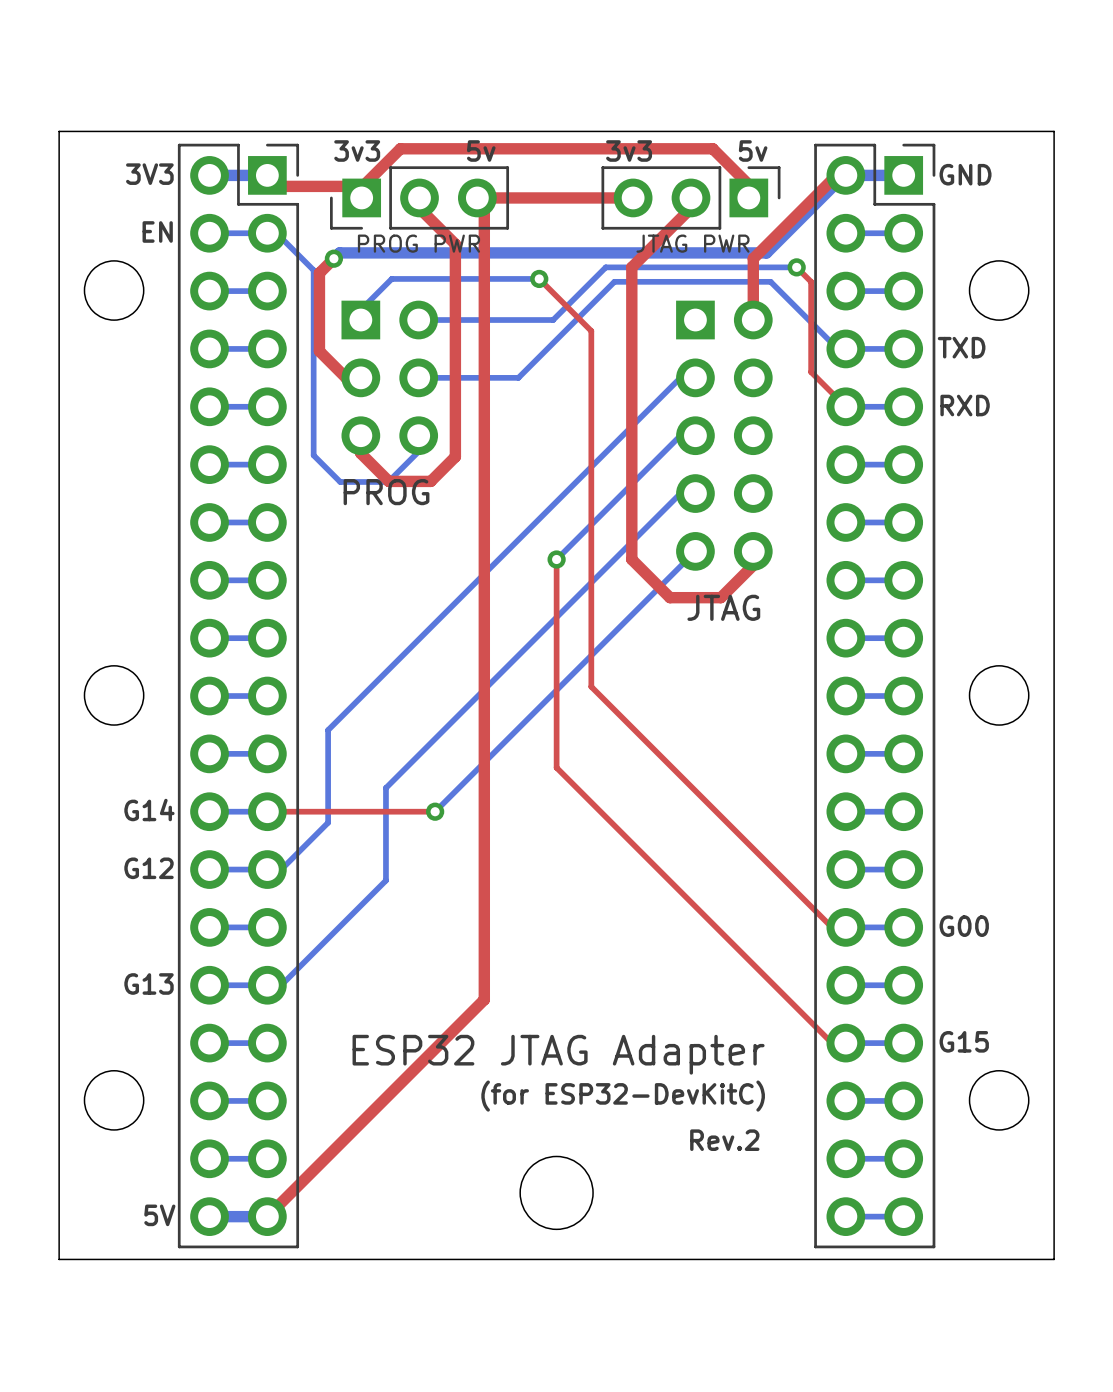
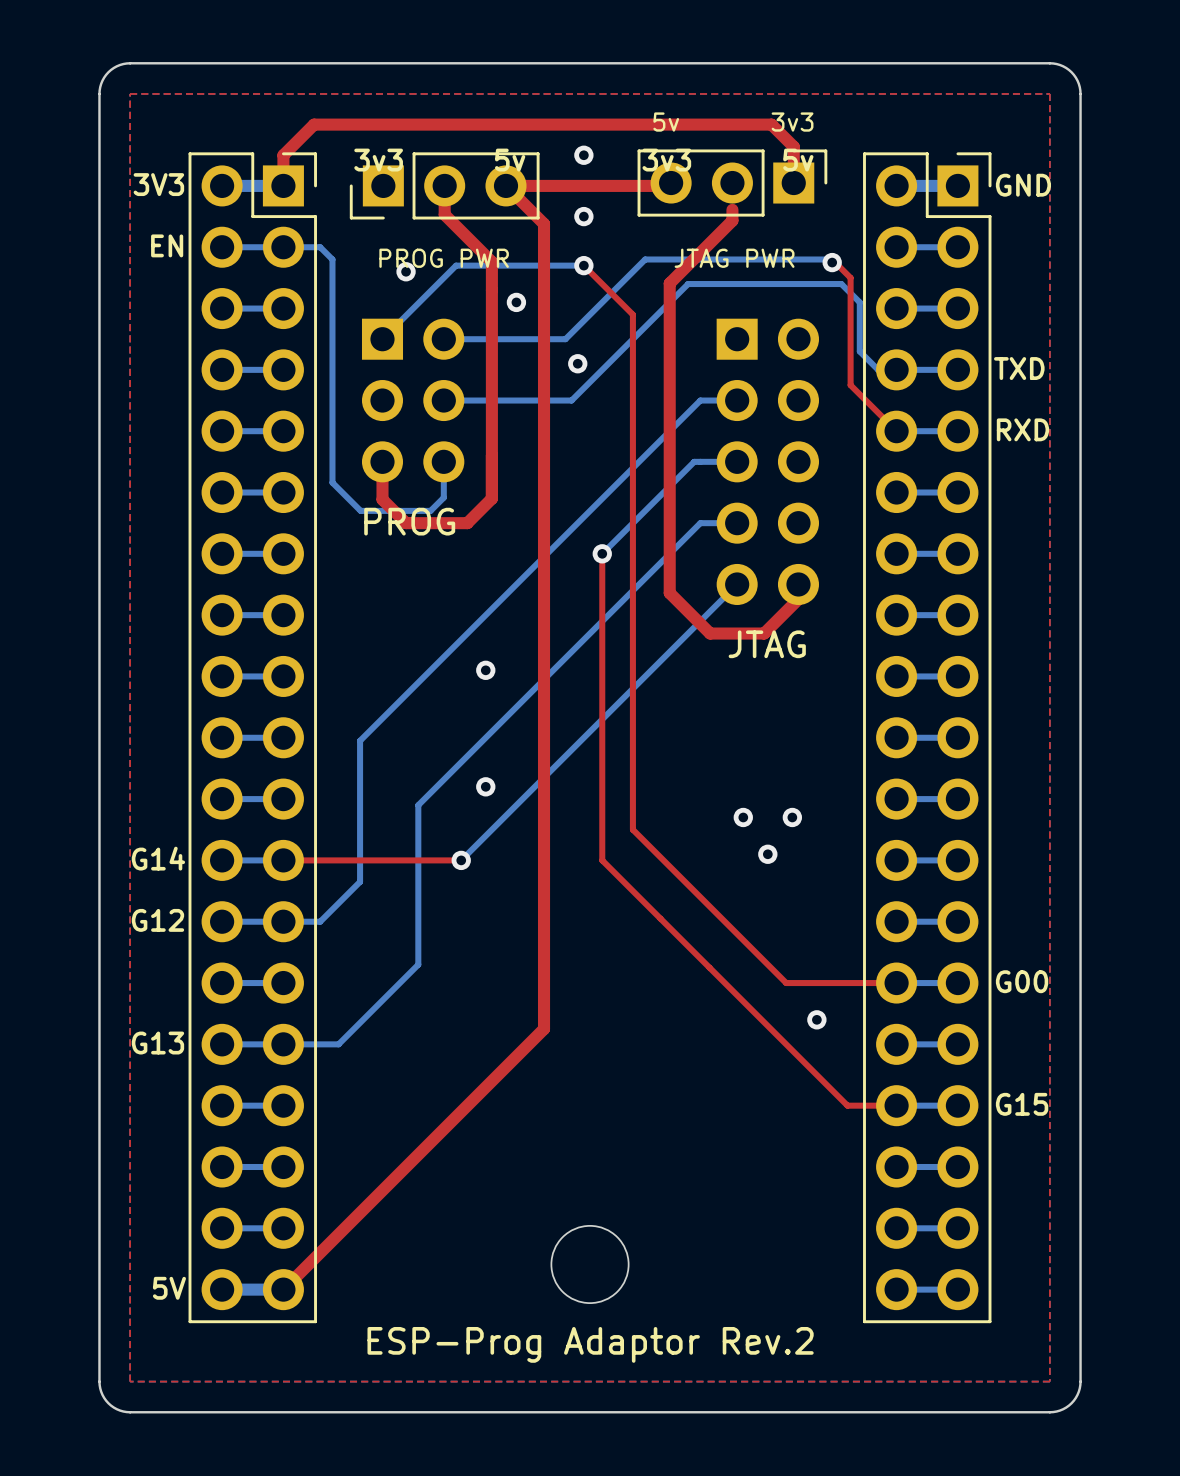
top zone outline: none -> (130, 93) (130, 1381) (1049, 1381) (1049, 93) (130, 93)
text: none -> 5v 3v3 (733, 122)
board edge: (59, 131) (1054, 131) (1054, 1259) (59, 1259) (59, 131) -> (130, 63) (120, 65) (108, 72) (101, 83) (99, 93) (99, 1381) (104, 1397) (116, 1409) (130, 1412) (1049, 1412) (1066, 1407) (1077, 1394) (1080, 1381) (1080, 93) (1075, 77) (1063, 66) (1049, 63) (130, 63)
via: none -> (583, 155)
top track: (267, 175) (278, 186) (350, 186) (361, 197) (361, 187) (400, 148) (712, 148) (748, 184) (748, 197) -> (283, 185) (283, 155) (314, 124) (771, 124) (793, 146) (793, 183)
top track: (845, 175) (836, 175) (753, 258) (753, 320) -> none
bottom track: (845, 175) (766, 252) (339, 252) (333, 258) -> none
part position: (419, 197) -> (444, 185)
top track: (633, 197) (477, 197) (484, 204) (484, 999) -> (671, 183) (668, 185) (506, 185) (544, 223) (544, 1029) (513, 1059)
part position: (690, 197) -> (732, 183)
top track: (419, 202) (419, 208) (455, 244) (455, 456) (430, 481) (388, 481) (360, 453) -> (444, 214) (491, 261) (491, 498) (467, 523) (406, 523) (382, 499) (382, 480)
via: none -> (583, 216)
bottom track: (276, 233) (313, 270) -> (293, 247) (320, 247) (332, 259) (332, 286)
via: none -> (583, 265)
top track: (333, 258) (319, 273) (319, 351) (346, 377) (360, 377) -> none
via position: (333, 258) -> (406, 271)
round board edge: [83, 260, 145, 321] -> none
round board edge: [968, 260, 1030, 321] -> none
top track: (796, 267) (811, 281) (811, 372) -> (832, 262) (835, 262) (850, 277) (850, 385) (859, 394)
bottom track: (796, 267) (605, 267) (553, 320) (533, 320) -> (832, 262) (829, 259) (645, 259) (565, 339)
via position: (796, 267) -> (832, 262)
top track: (539, 278) (591, 331) (591, 686) (831, 927) -> (583, 265) (632, 314) (632, 829) (786, 983) (881, 983)
bottom track: (539, 278) (391, 278) (360, 309) (360, 320) -> (583, 265) (456, 265) (382, 339)
via: (539, 278) -> none
via: none -> (516, 302)
via: none -> (577, 363)
bottom track: (837, 348) (770, 281) (614, 281) (518, 377) -> (888, 369) (878, 369) (859, 351) (859, 302) (841, 284) (688, 284) (571, 400) (549, 400)
bottom track: (680, 377) (328, 730) (328, 822) (281, 869) -> (721, 400) (700, 400) (360, 740) (360, 881) (320, 921) (298, 921)
bottom track: (680, 435) (556, 559) -> (721, 461) (694, 461) (602, 553)
bottom track: (418, 451) (388, 481) -> (443, 478) (443, 497) (430, 510) (411, 510)
bottom track: (680, 493) (385, 787) (385, 880) (281, 985) -> (721, 523) (700, 523) (418, 805) (418, 964) (338, 1044) (298, 1044)
top track: (556, 559) (556, 767) (831, 1043) -> (602, 553) (602, 860) (847, 1105) (881, 1105)
via position: (556, 559) -> (602, 553)
via: none -> (485, 670)
round board edge: [83, 665, 145, 726] -> none
round board edge: [968, 665, 1030, 726] -> none
via: none -> (485, 786)
via: none -> (743, 817)
via: none -> (792, 817)
via: none -> (767, 854)
via: none -> (816, 1019)
text: ESP32 JTAG Adapter (558, 1054) -> none
round board edge: [83, 1070, 145, 1131] -> none
round board edge: [968, 1070, 1030, 1131] -> none
text: (for ESP32-DevKitC) (623, 1096) -> none
text: Rev.2 (724, 1140) -> none
text: none -> ESP-Prog Adaptor Rev.2 (590, 1344)

